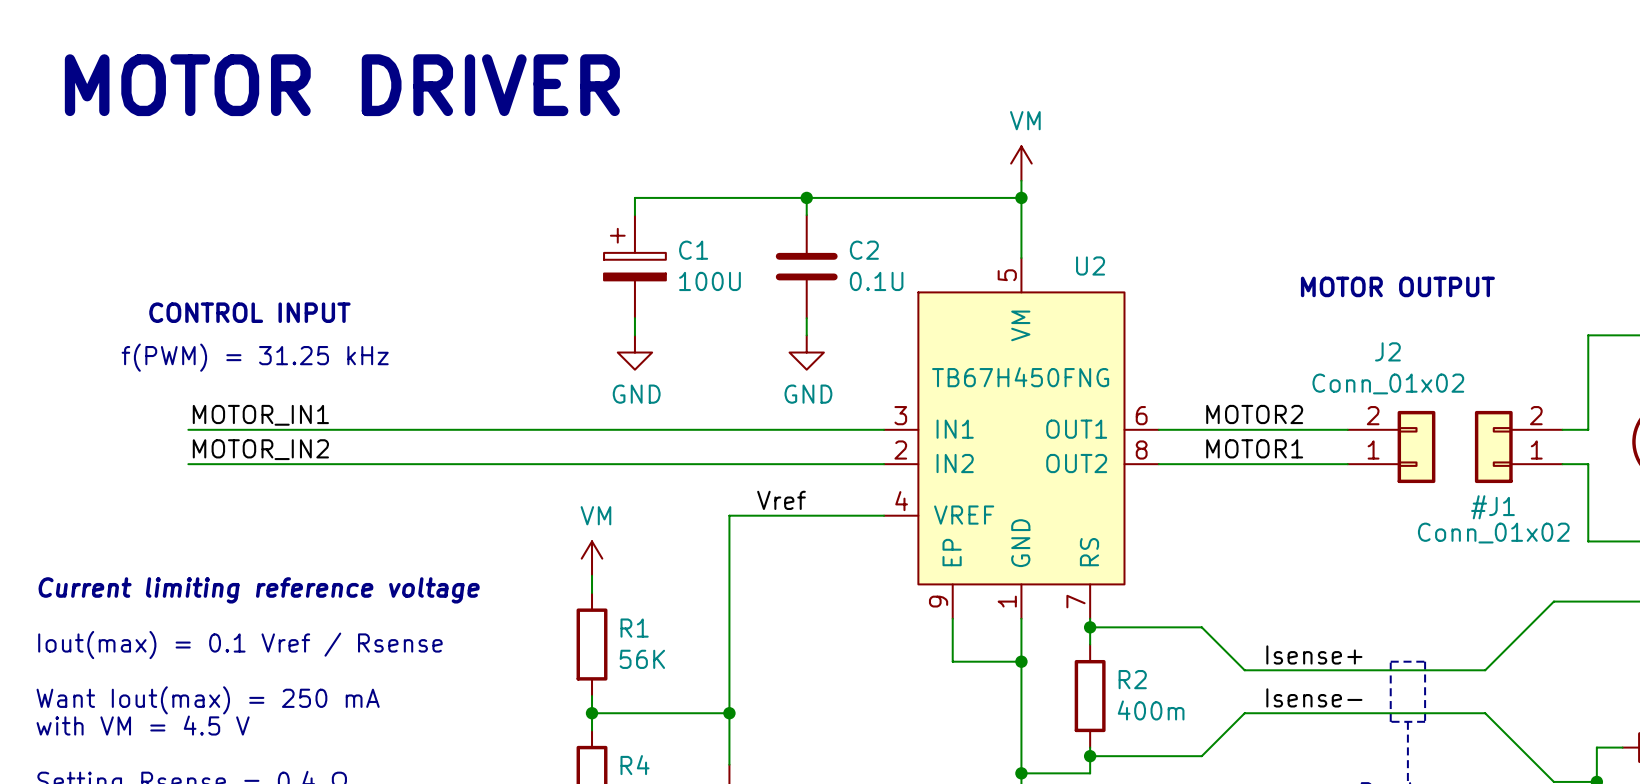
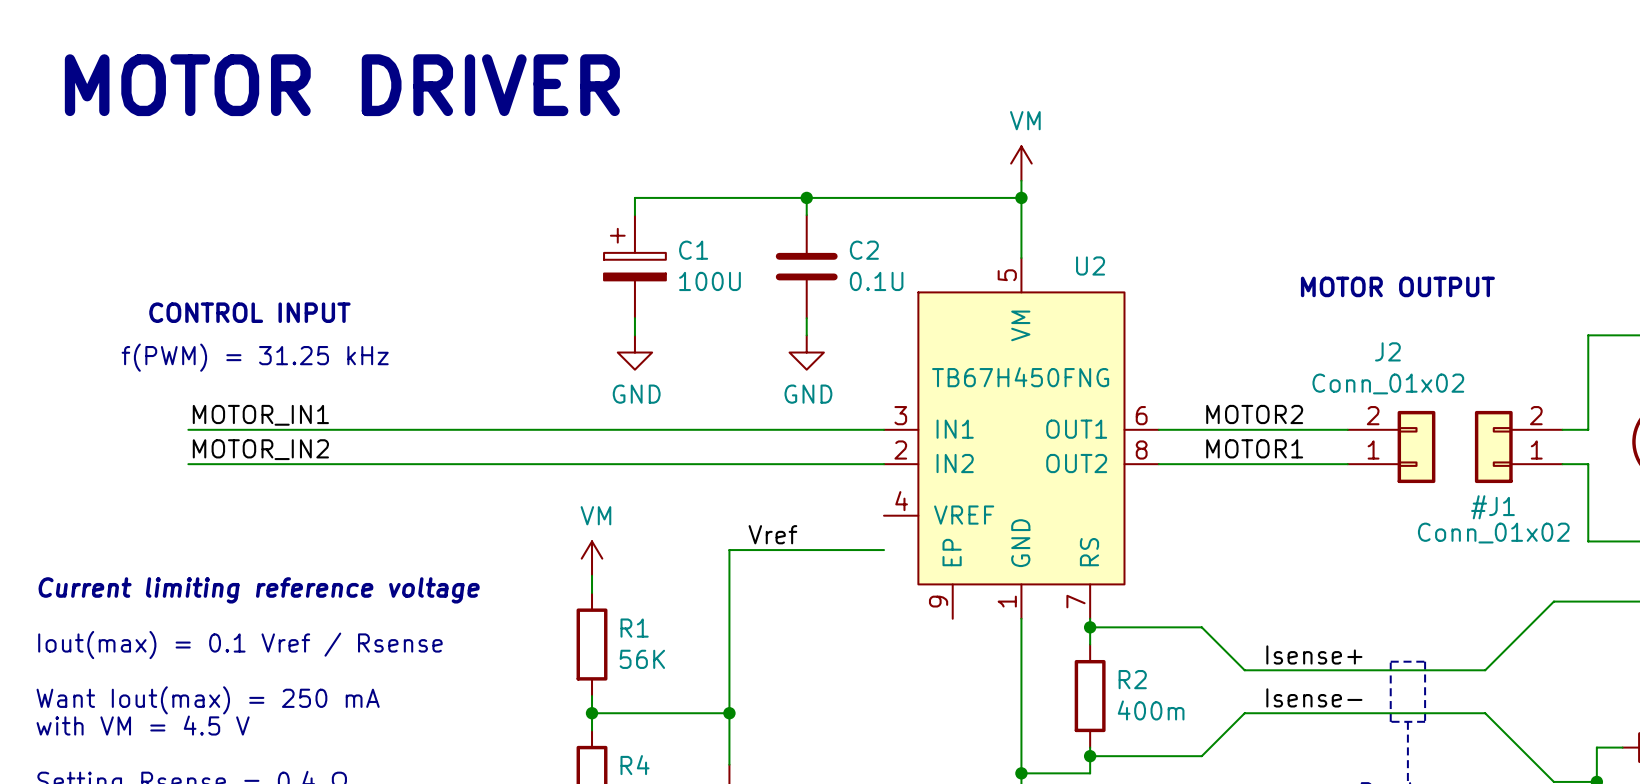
label position: Vref (781, 500) -> Vref (772, 534)
wire: (884, 515) (729, 515) (729, 550) -> (884, 550) (729, 550)
wire: (952, 618) (952, 661) (1021, 661) -> none
junction: (1021, 661) -> none

